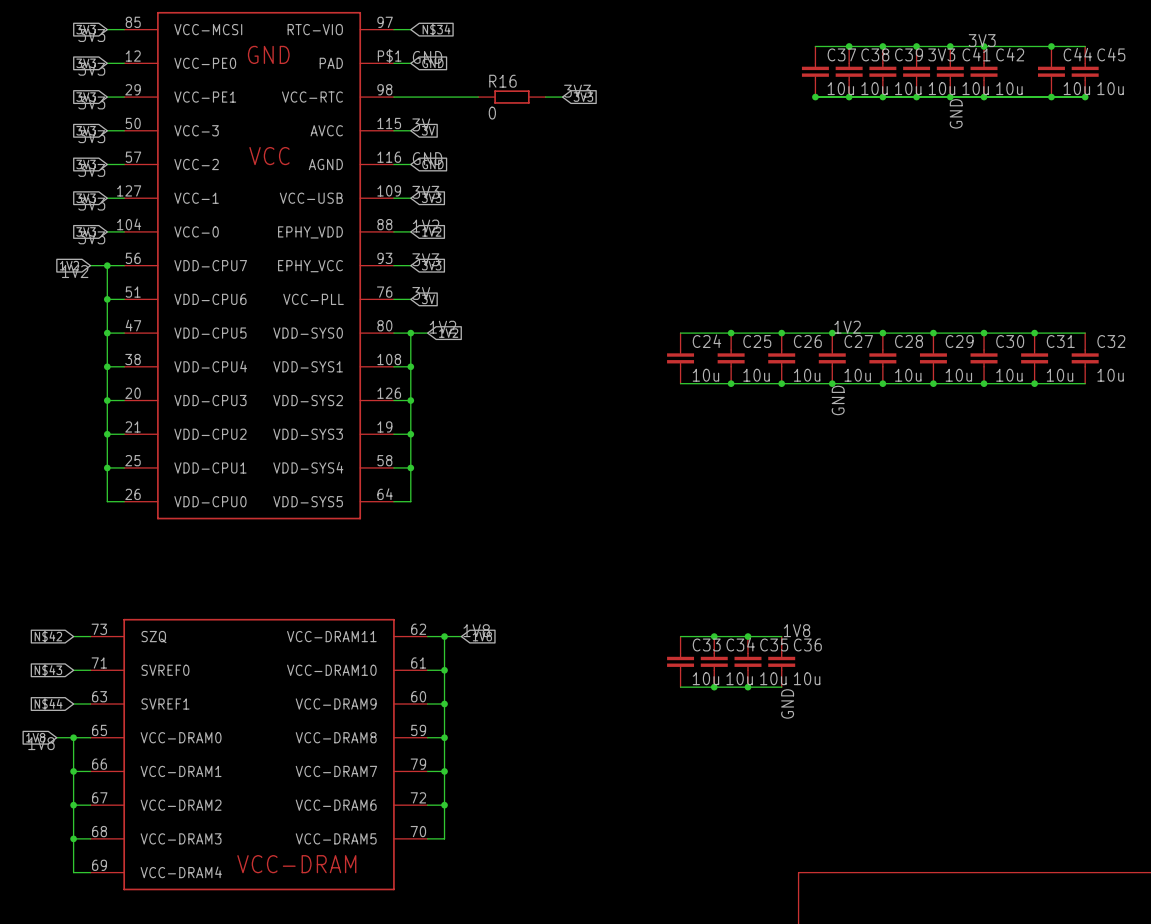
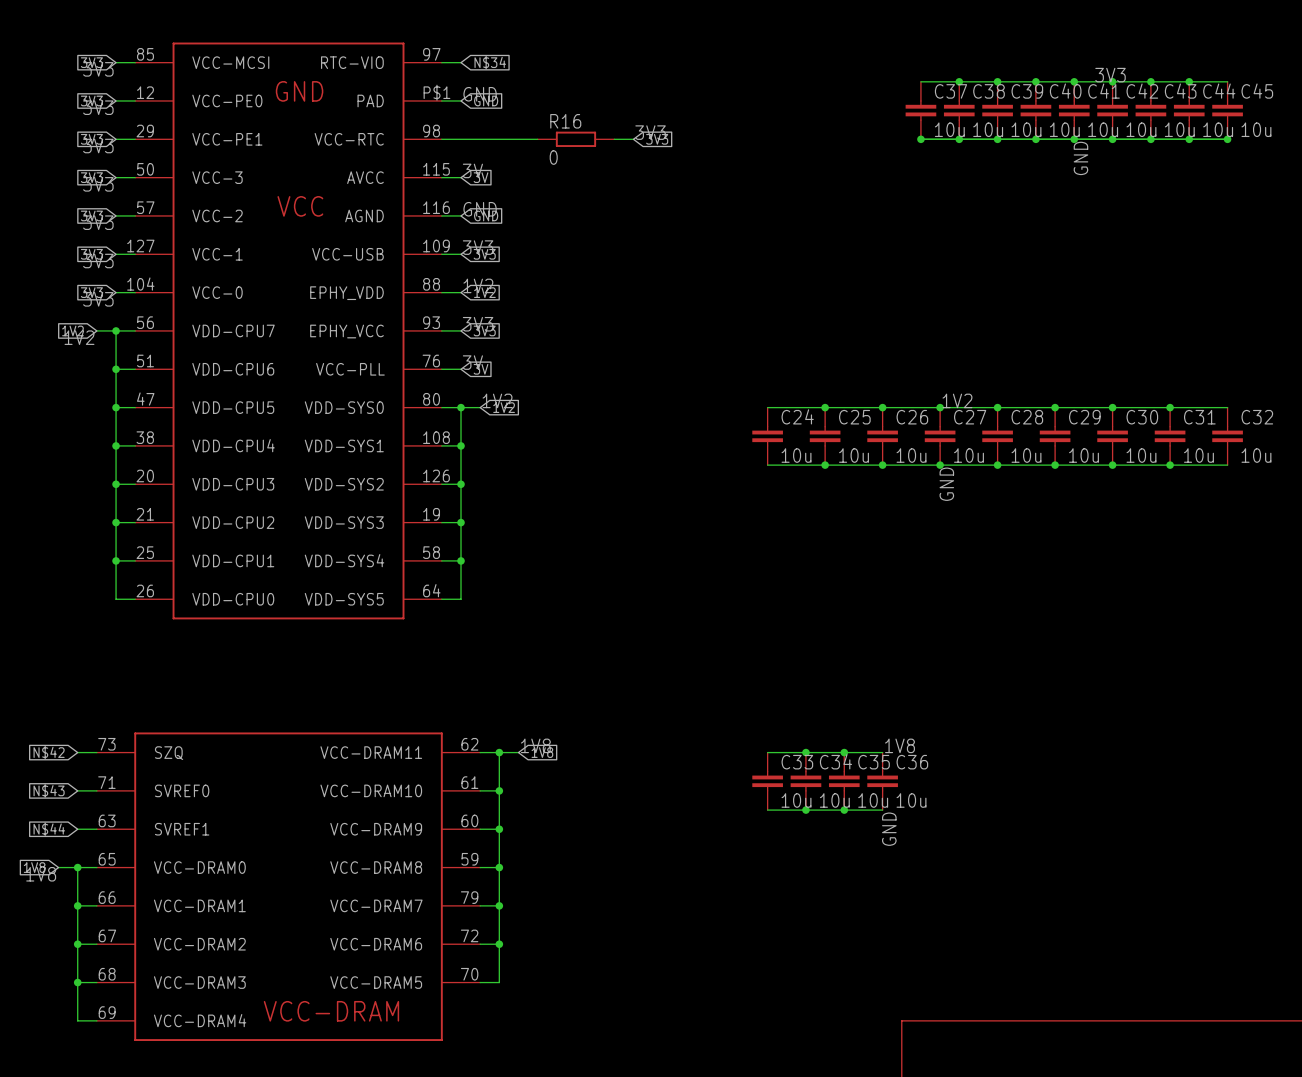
junction: none -> (1150, 81)
3V3 name: 3V3 (941, 54) -> C40 (1065, 91)
C43: none -> 10u (1150, 110)
junction: none -> (1150, 139)

